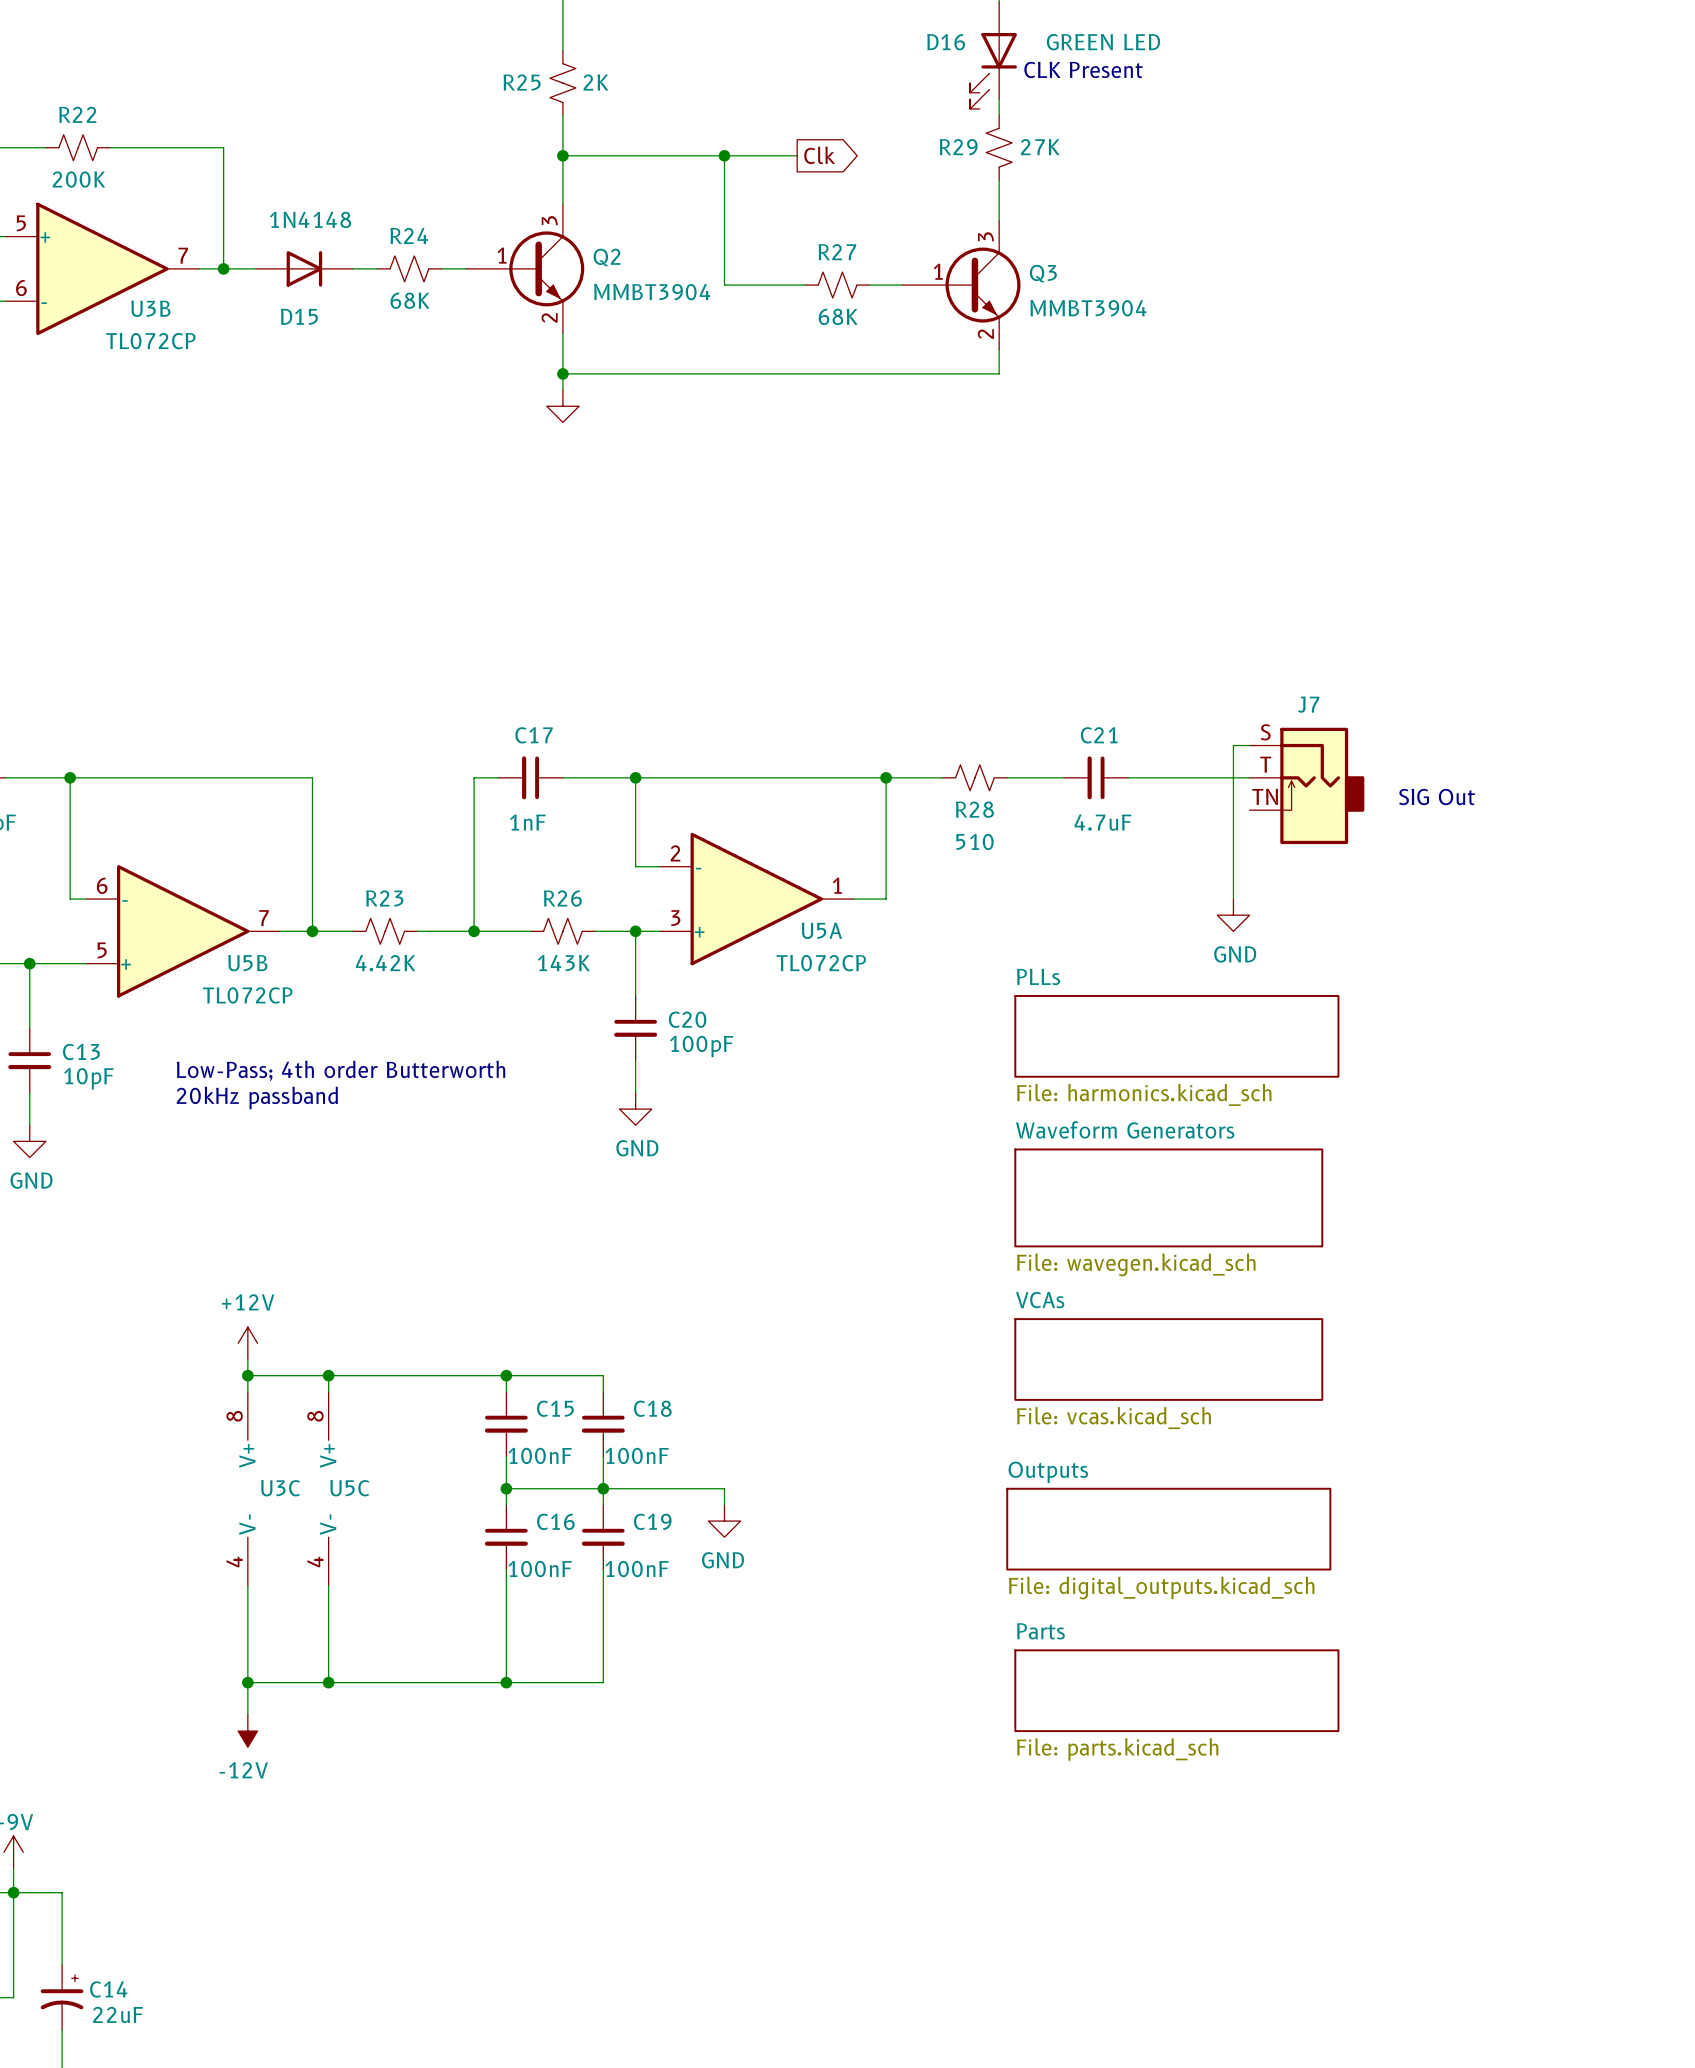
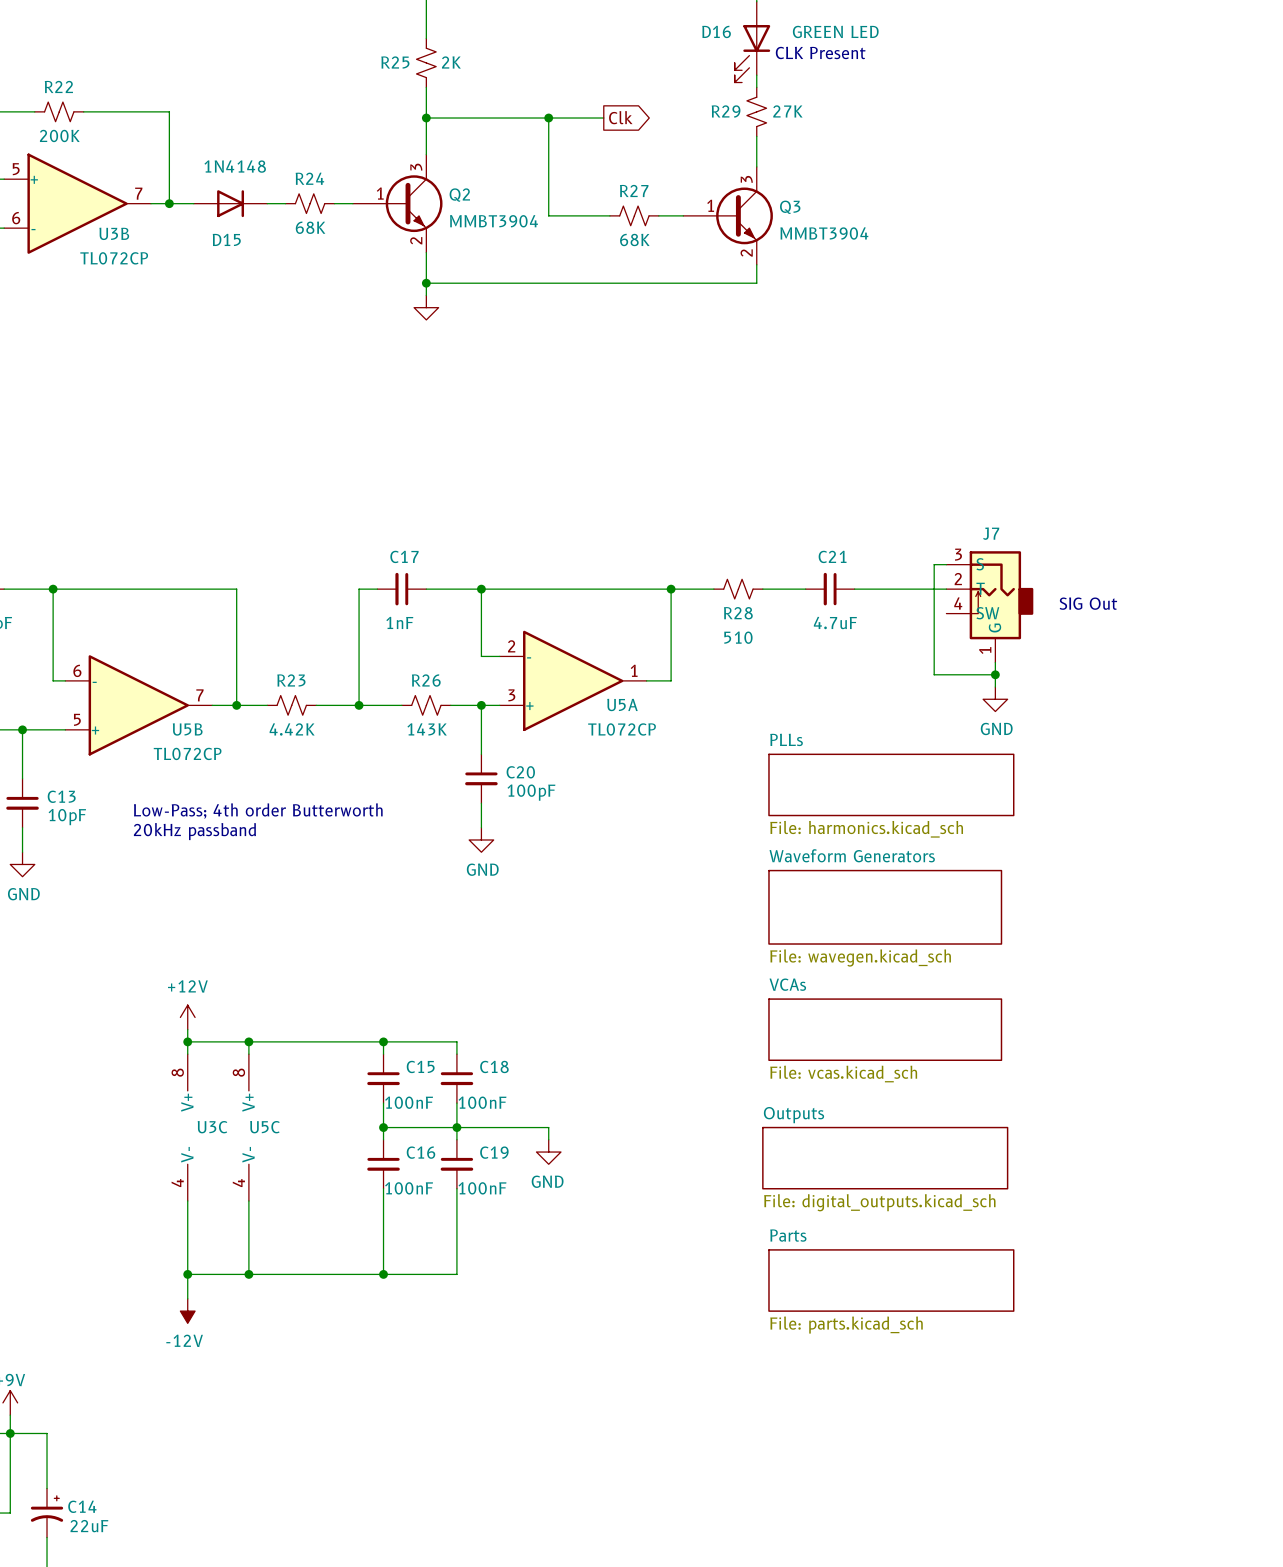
J7 symbol: [1249, 727, 1365, 845] -> [946, 551, 1034, 663]
wire: none -> (995, 662) (995, 687)
wire: (1233, 890) (1233, 899) -> (934, 674) (995, 674)
junction: none -> (995, 674)
power symbol position: GND (1233, 915) -> GND (995, 699)

